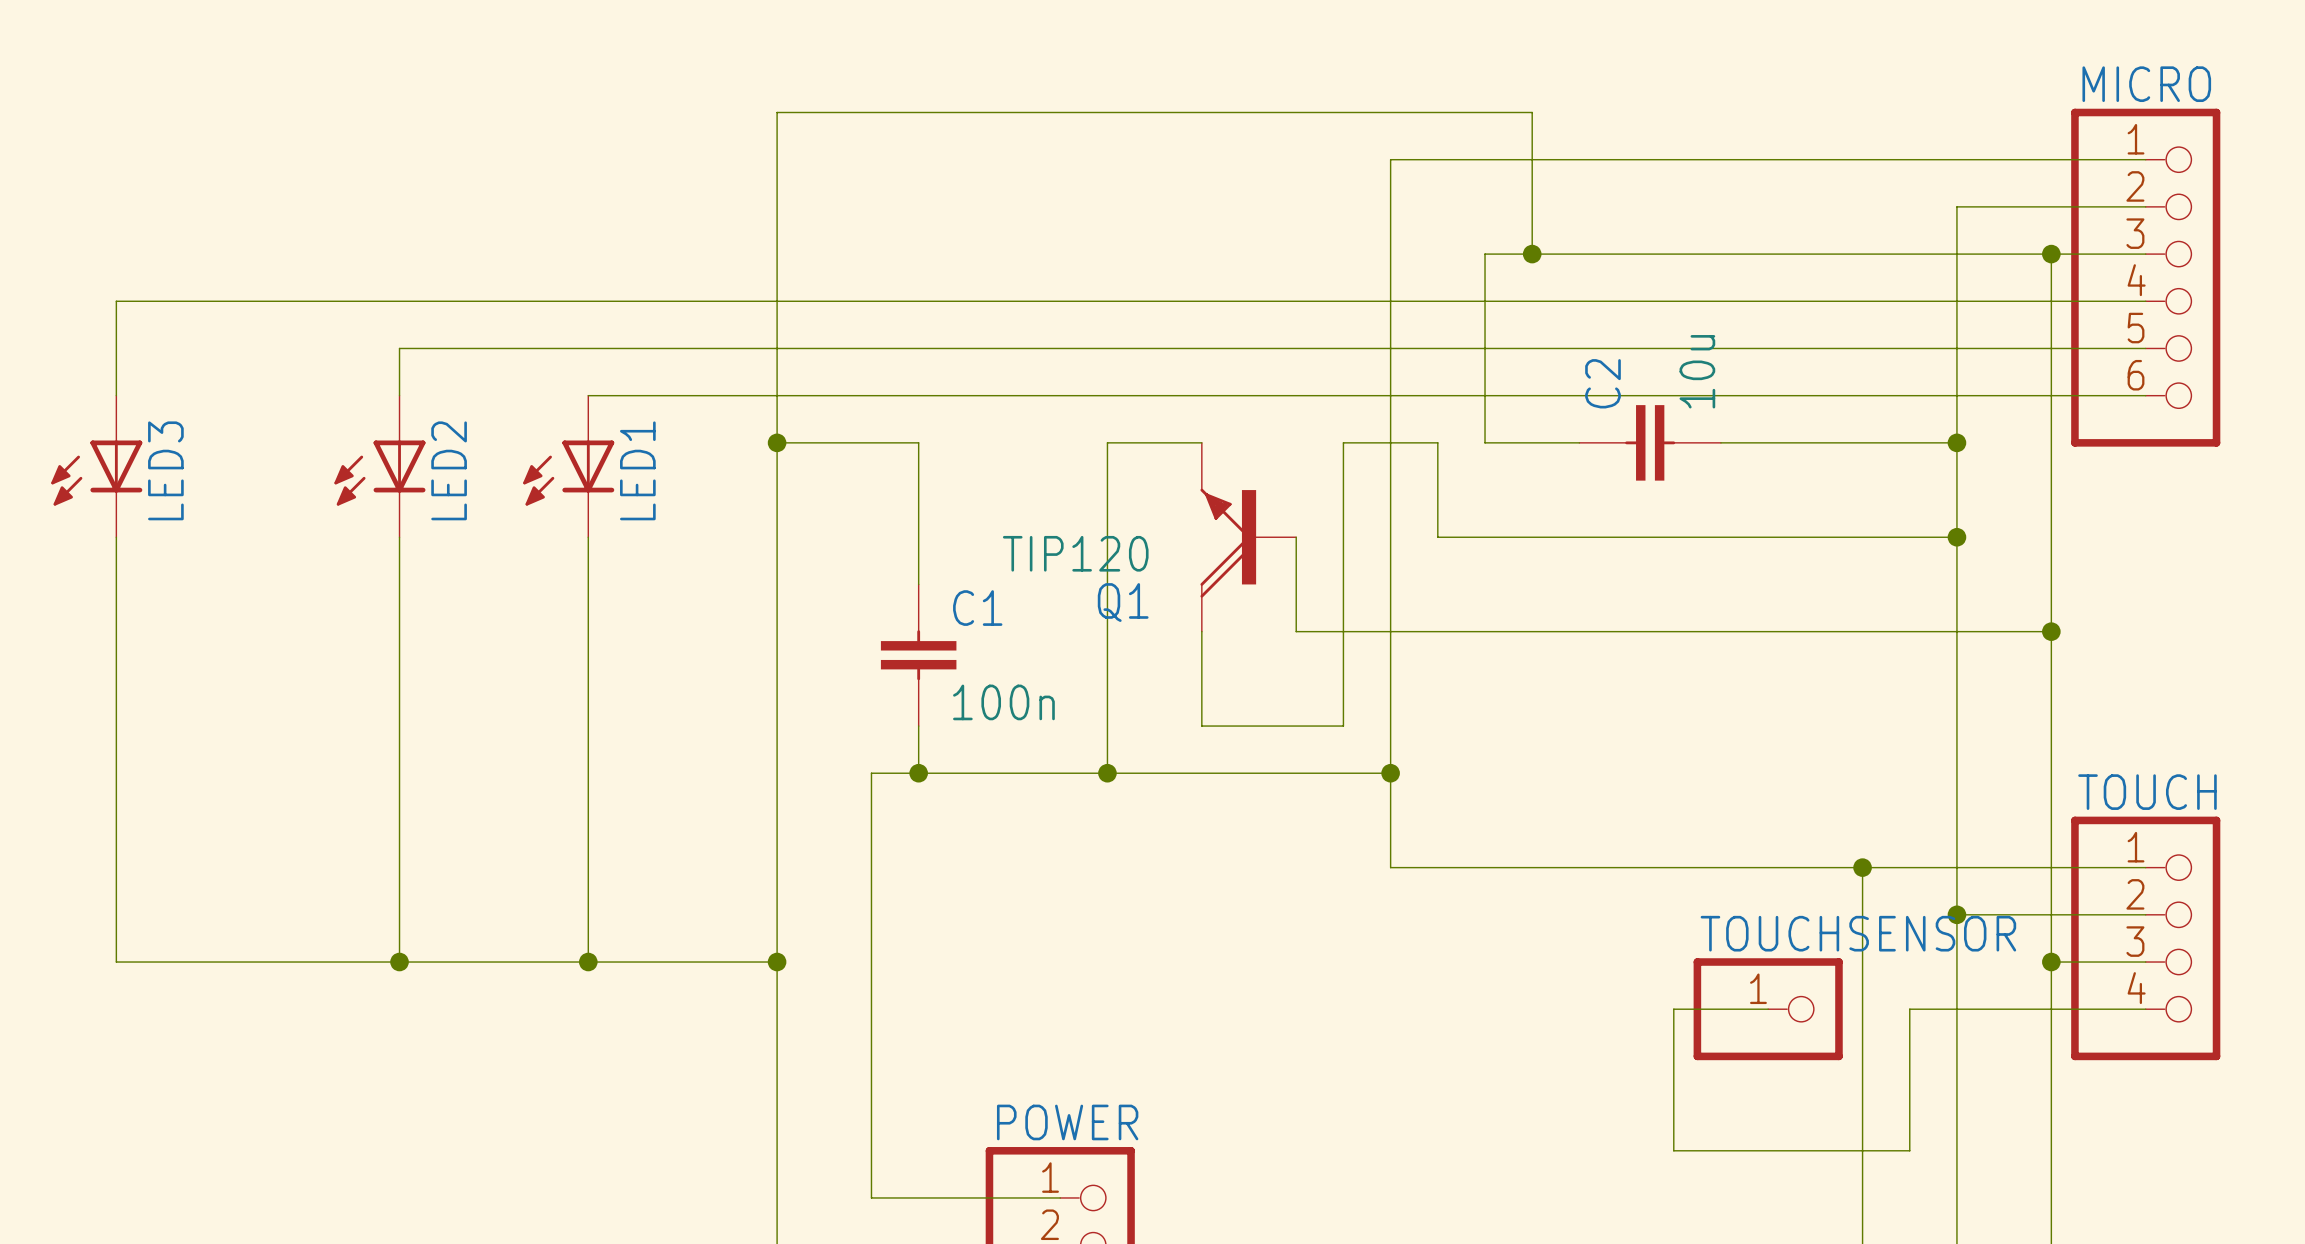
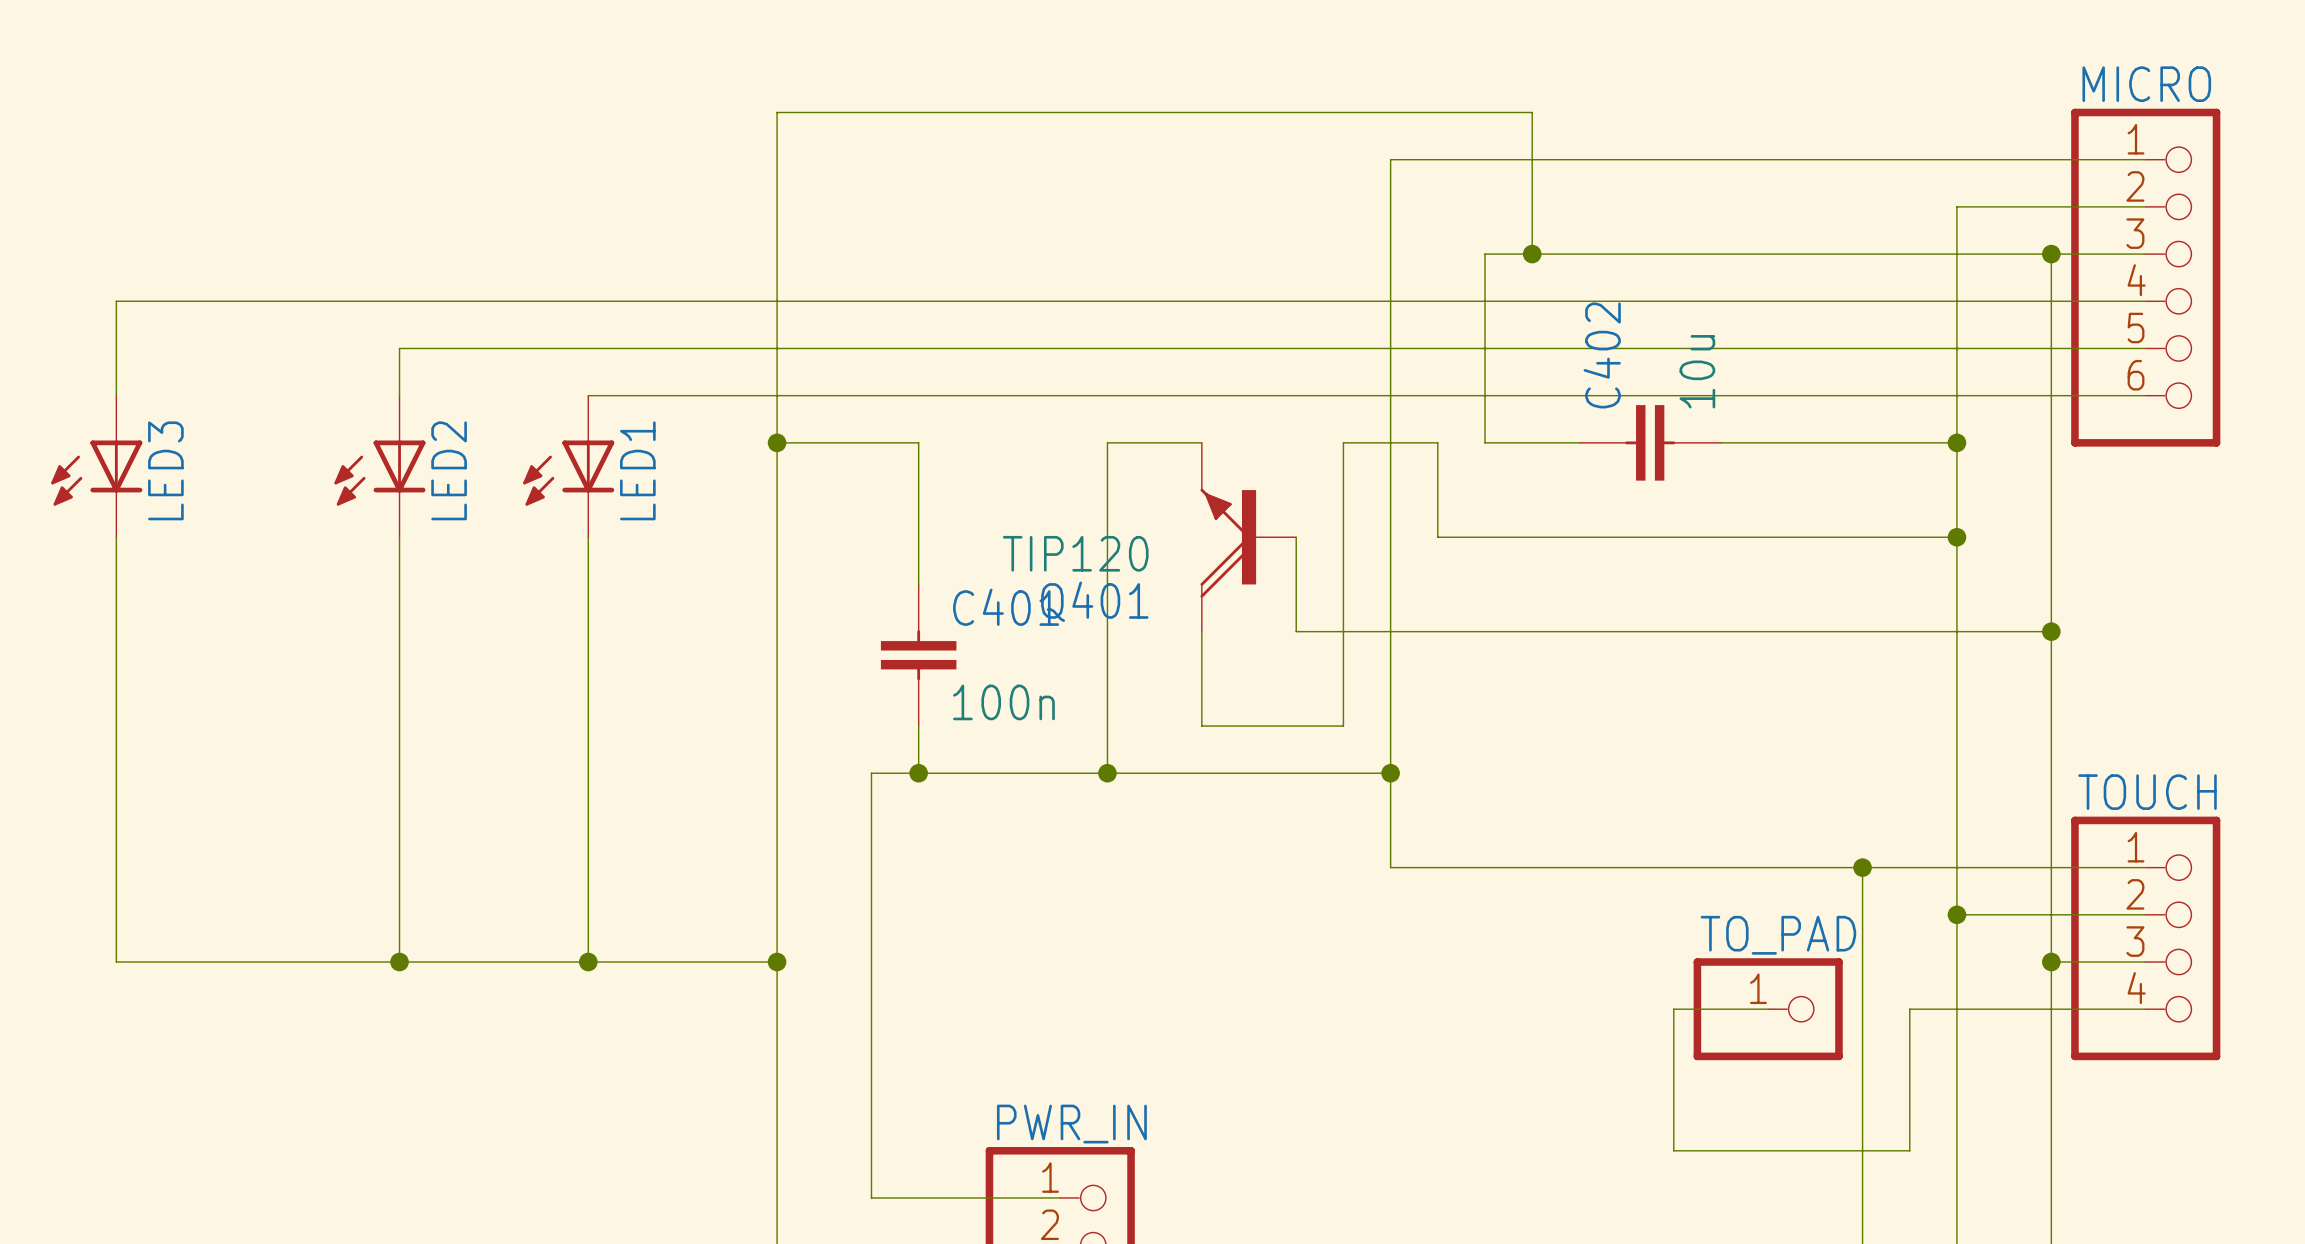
C2 name: C2 (1602, 383) -> C402 (1602, 355)
Q1 name: Q1 (1123, 602) -> Q401 (1094, 601)
C1 name: C1 (977, 608) -> C401 (1006, 607)
TOUCHSENSOR name: TOUCHSENSOR (1858, 933) -> TO_PAD (1778, 935)
POWER name: POWER (1067, 1122) -> PWR_IN (1071, 1124)

